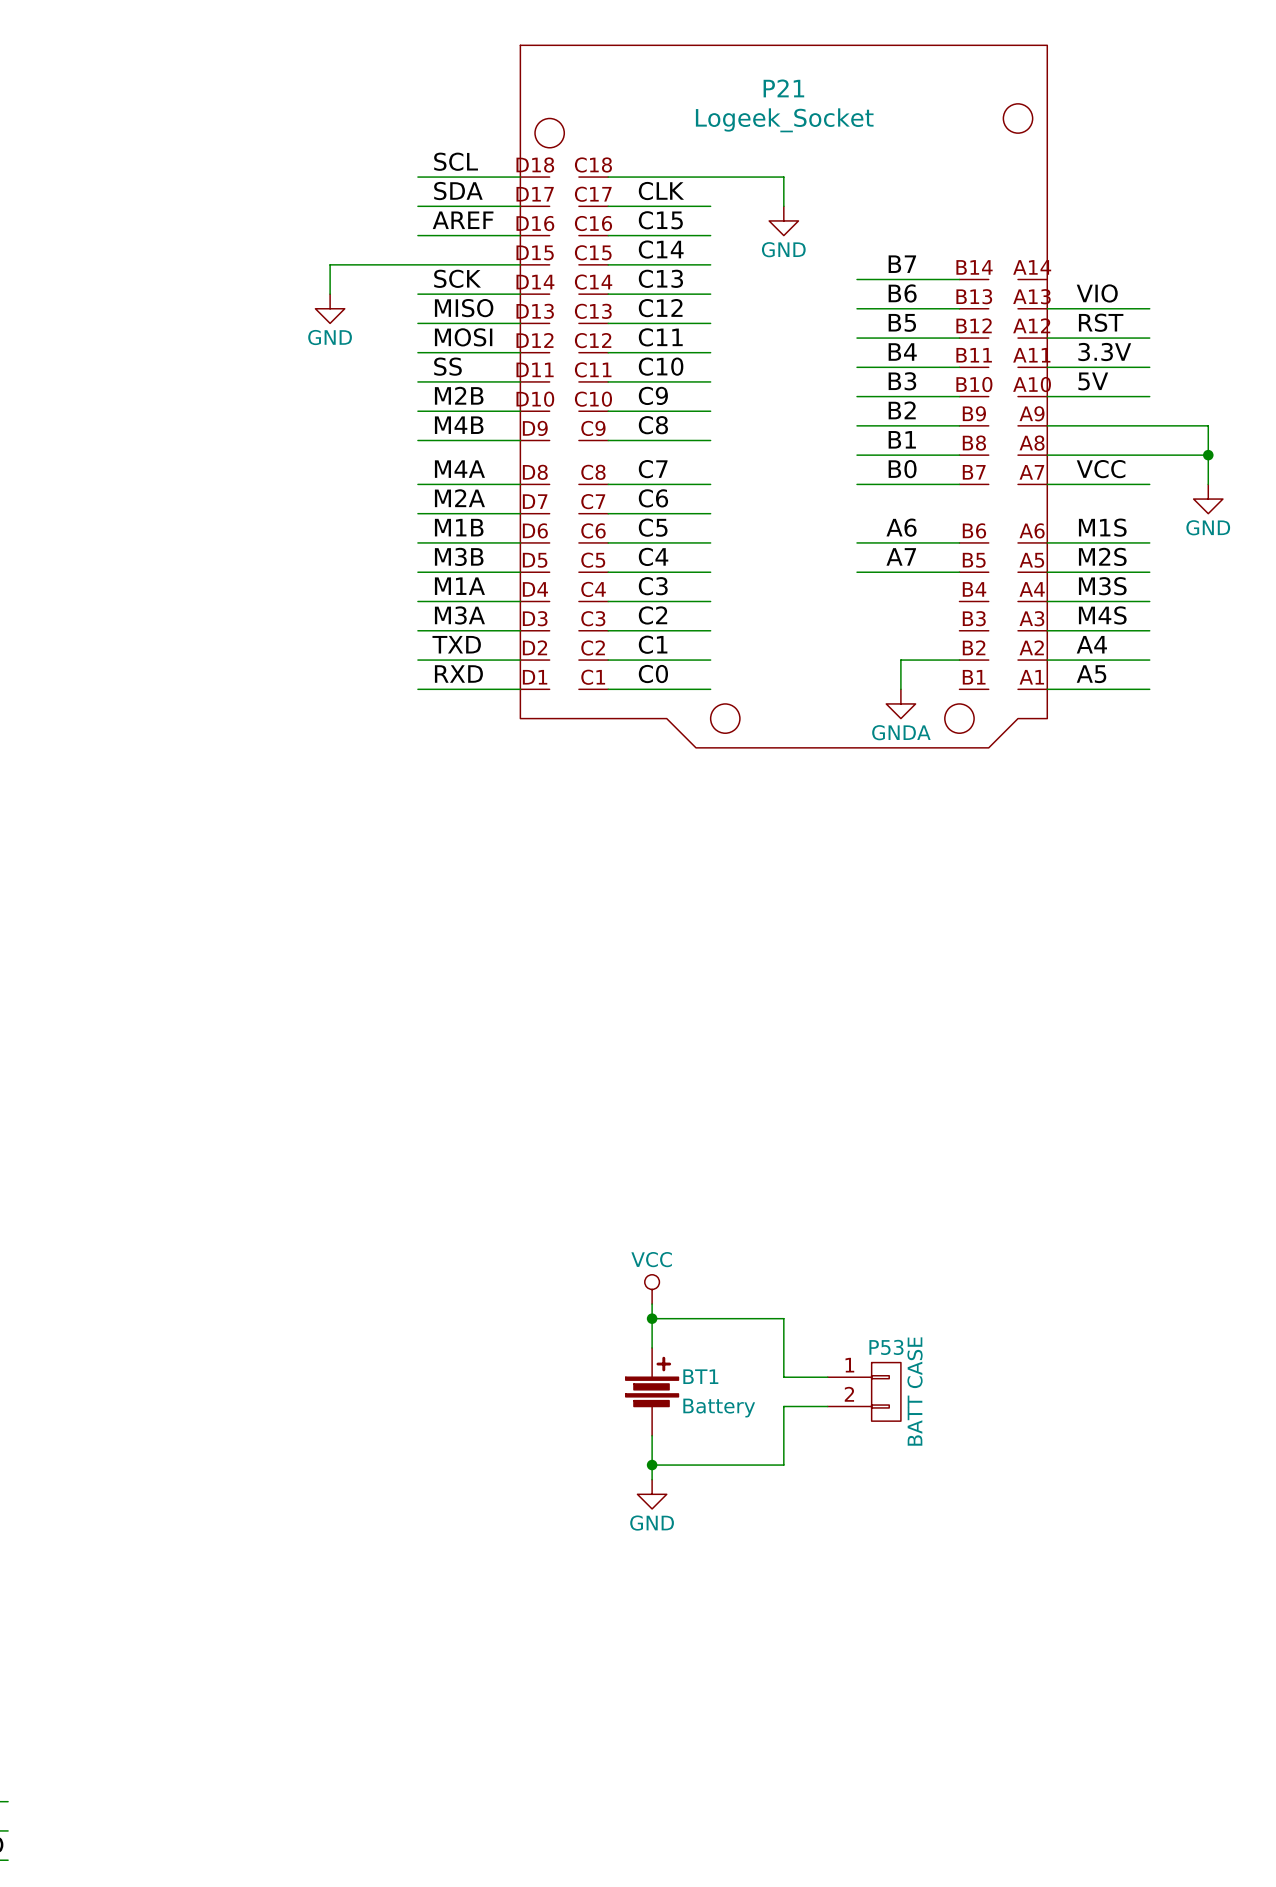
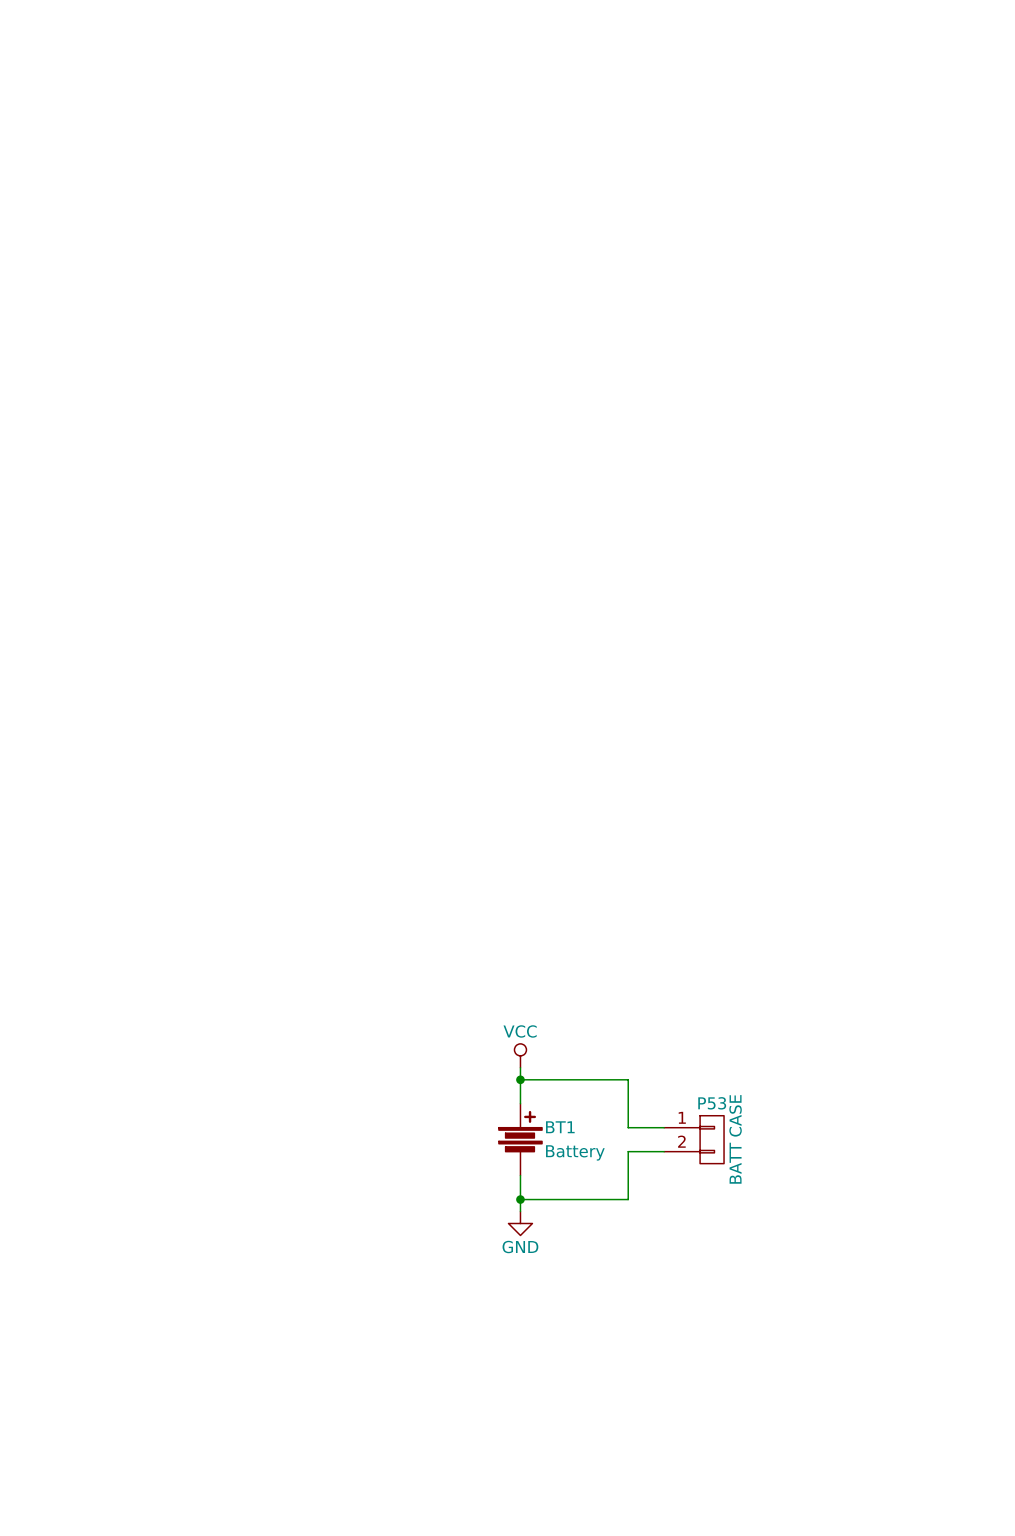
label: SCL (456, 161) -> none
wire: (417, 177) (520, 177) -> none
wire: (608, 177) (783, 177) (783, 206) -> none
label: SDA (458, 191) -> none
label: CLK (661, 191) -> none
wire: (417, 206) (520, 206) -> none
wire: (608, 206) (710, 206) -> none
label: AREF (463, 220) -> none
label: C15 (660, 220) -> none
power symbol: GND (783, 220) -> none
wire: (417, 235) (520, 235) -> none
wire: (608, 235) (710, 235) -> none
label: C14 (661, 249) -> none
wire: (520, 264) (330, 264) (330, 294) -> none
wire: (608, 264) (710, 264) -> none
label: B7 (902, 264) -> none
label: SCK (457, 278) -> none
label: C13 (660, 278) -> none
wire: (857, 279) (959, 279) -> none
label: B6 (902, 293) -> none
label: VIO (1097, 293) -> none
wire: (417, 294) (520, 294) -> none
wire: (608, 294) (710, 294) -> none
power symbol: GND (330, 308) -> none
label: MISO (464, 308) -> none
label: C12 (660, 308) -> none
wire: (857, 308) (959, 308) -> none
wire: (1047, 308) (1149, 308) -> none
label: B5 (902, 322) -> none
label: RST (1101, 322) -> none
wire: (417, 323) (520, 323) -> none
wire: (608, 323) (710, 323) -> none
label: MOSI (463, 337) -> none
label: C11 (660, 337) -> none
wire: (857, 338) (959, 338) -> none
wire: (1047, 338) (1149, 338) -> none
wire: (417, 352) (520, 352) -> none
wire: (608, 352) (710, 352) -> none
label: B4 (902, 352) -> none
label: 3.3V (1104, 352) -> none
label: SS (447, 366) -> none
label: C10 (661, 366) -> none
wire: (857, 367) (959, 367) -> none
wire: (1047, 367) (1149, 367) -> none
wire: (417, 381) (520, 381) -> none
wire: (608, 381) (710, 381) -> none
label: B3 (902, 381) -> none
label: 5V (1093, 381) -> none
label: M2B (459, 395) -> none
label: C9 (653, 395) -> none
P21: Logeek_Socket (783, 396) -> none
wire: (857, 396) (959, 396) -> none
wire: (1047, 396) (1149, 396) -> none
label: B2 (902, 410) -> none
wire: (417, 411) (520, 411) -> none
wire: (608, 411) (710, 411) -> none
label: M4B (459, 425) -> none
label: C8 (653, 425) -> none
wire: (857, 425) (959, 425) -> none
wire: (1047, 425) (1208, 425) (1208, 484) -> none
label: B1 (902, 439) -> none
wire: (417, 440) (520, 440) -> none
wire: (608, 440) (710, 440) -> none
wire: (857, 455) (959, 455) -> none
wire: (1047, 455) (1208, 455) -> none
junction: (1208, 455) -> none
label: M4A (459, 469) -> none
label: C7 (653, 469) -> none
label: B0 (902, 469) -> none
label: VCC (1101, 469) -> none
wire: (417, 484) (520, 484) -> none
wire: (608, 484) (710, 484) -> none
wire: (857, 484) (959, 484) -> none
wire: (1047, 484) (1149, 484) -> none
label: M2A (459, 498) -> none
label: C6 (653, 498) -> none
power symbol: GND (1208, 499) -> none
wire: (417, 513) (520, 513) -> none
wire: (608, 513) (710, 513) -> none
label: M1B (459, 527) -> none
label: C5 (653, 527) -> none
label: A6 (901, 527) -> none
label: M1S (1102, 527) -> none
wire: (417, 542) (520, 542) -> none
wire: (608, 542) (710, 542) -> none
wire: (857, 542) (959, 542) -> none
wire: (1047, 542) (1149, 542) -> none
label: M3B (459, 556) -> none
label: C4 (653, 556) -> none
label: A7 (901, 556) -> none
label: M2S (1102, 556) -> none
wire: (417, 572) (520, 572) -> none
wire: (608, 572) (710, 572) -> none
wire: (857, 572) (959, 572) -> none
wire: (1047, 572) (1149, 572) -> none
label: M1A (459, 586) -> none
label: C3 (653, 586) -> none
label: M3S (1102, 586) -> none
wire: (417, 601) (520, 601) -> none
wire: (608, 601) (710, 601) -> none
wire: (1047, 601) (1149, 601) -> none
label: M3A (459, 615) -> none
label: C2 (653, 615) -> none
label: M4S (1102, 615) -> none
wire: (417, 630) (520, 630) -> none
wire: (608, 630) (710, 630) -> none
wire: (1047, 630) (1149, 630) -> none
label: TXD (456, 644) -> none
label: C1 (653, 644) -> none
label: A4 (1091, 644) -> none
wire: (417, 660) (520, 660) -> none
wire: (608, 660) (710, 660) -> none
wire: (959, 660) (900, 660) (900, 689) -> none
wire: (1047, 660) (1149, 660) -> none
label: RXD (458, 673) -> none
label: C0 (653, 674) -> none
label: A5 (1091, 674) -> none
wire: (417, 689) (520, 689) -> none
wire: (608, 689) (710, 689) -> none
wire: (1047, 689) (1149, 689) -> none
power symbol: GNDA (900, 703) -> none

